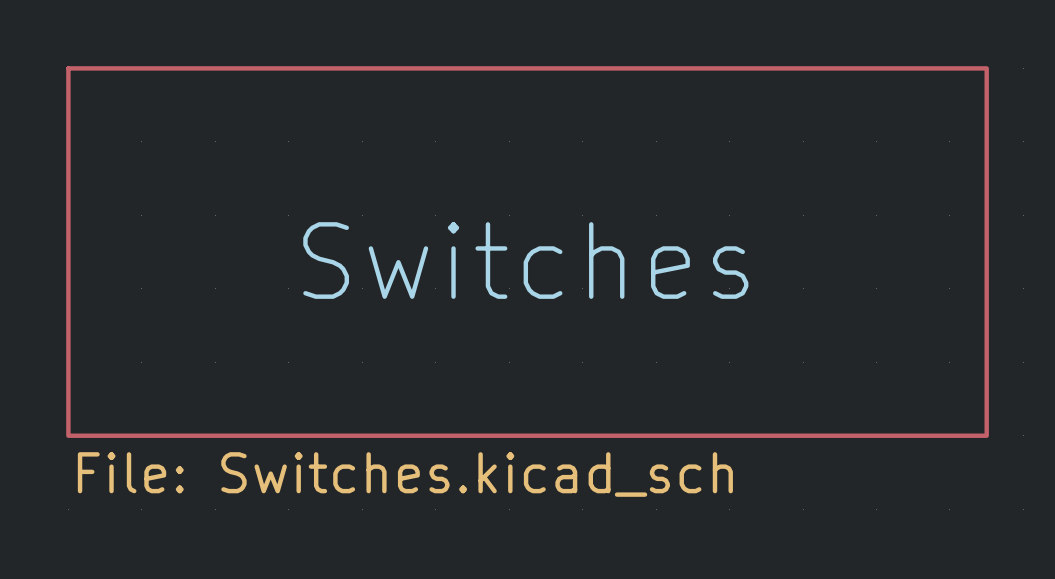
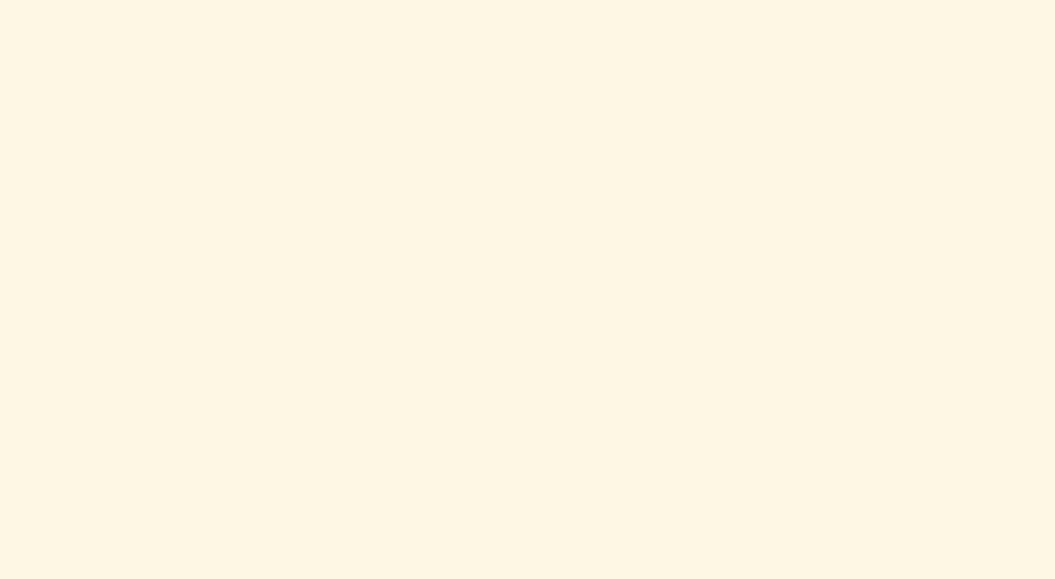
sheet Switches: File: Switches.kicad_sch (527, 252) -> none

